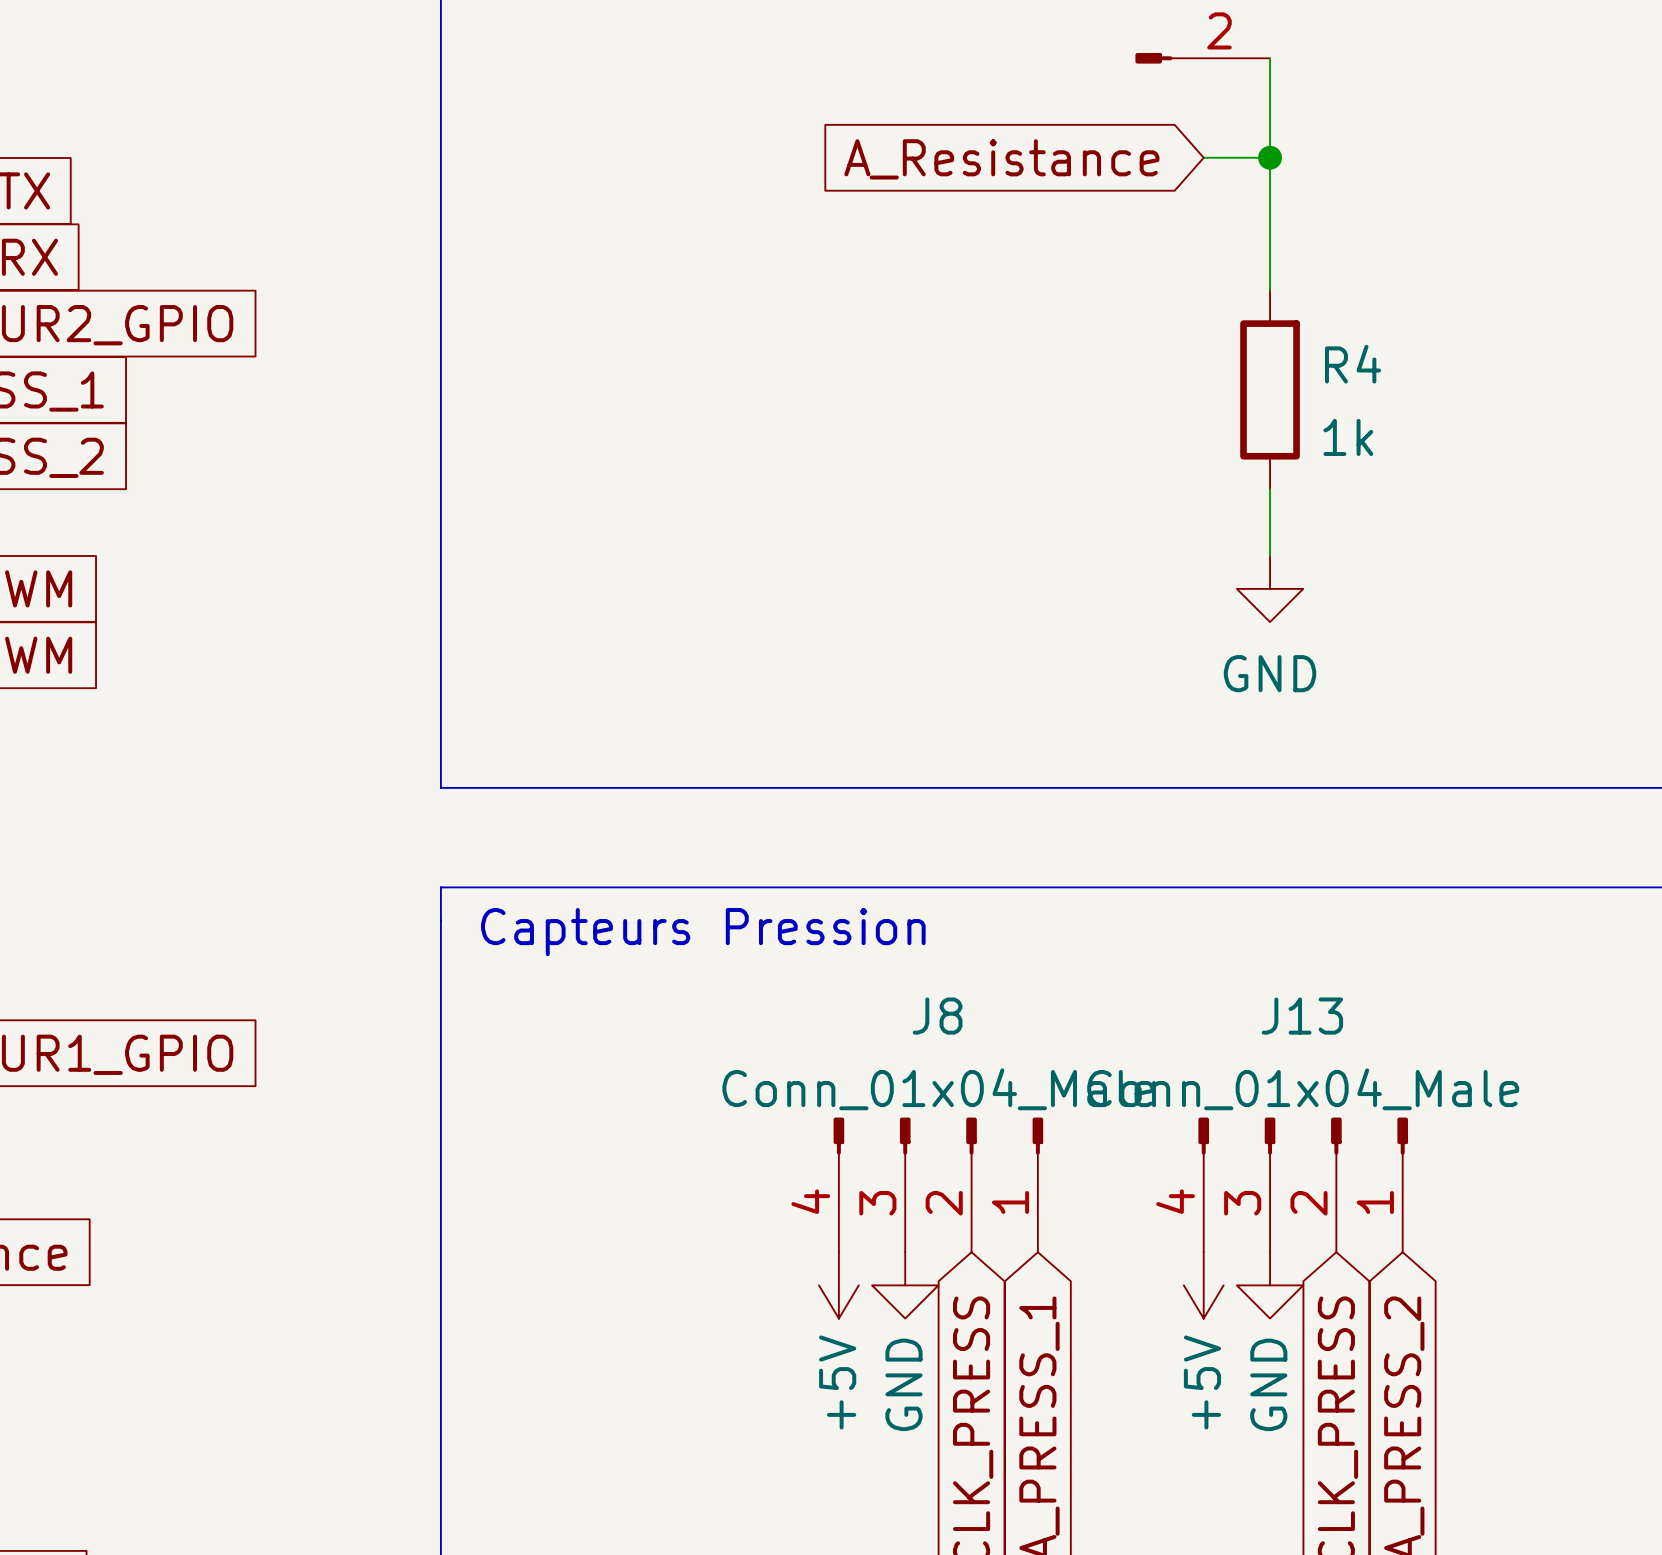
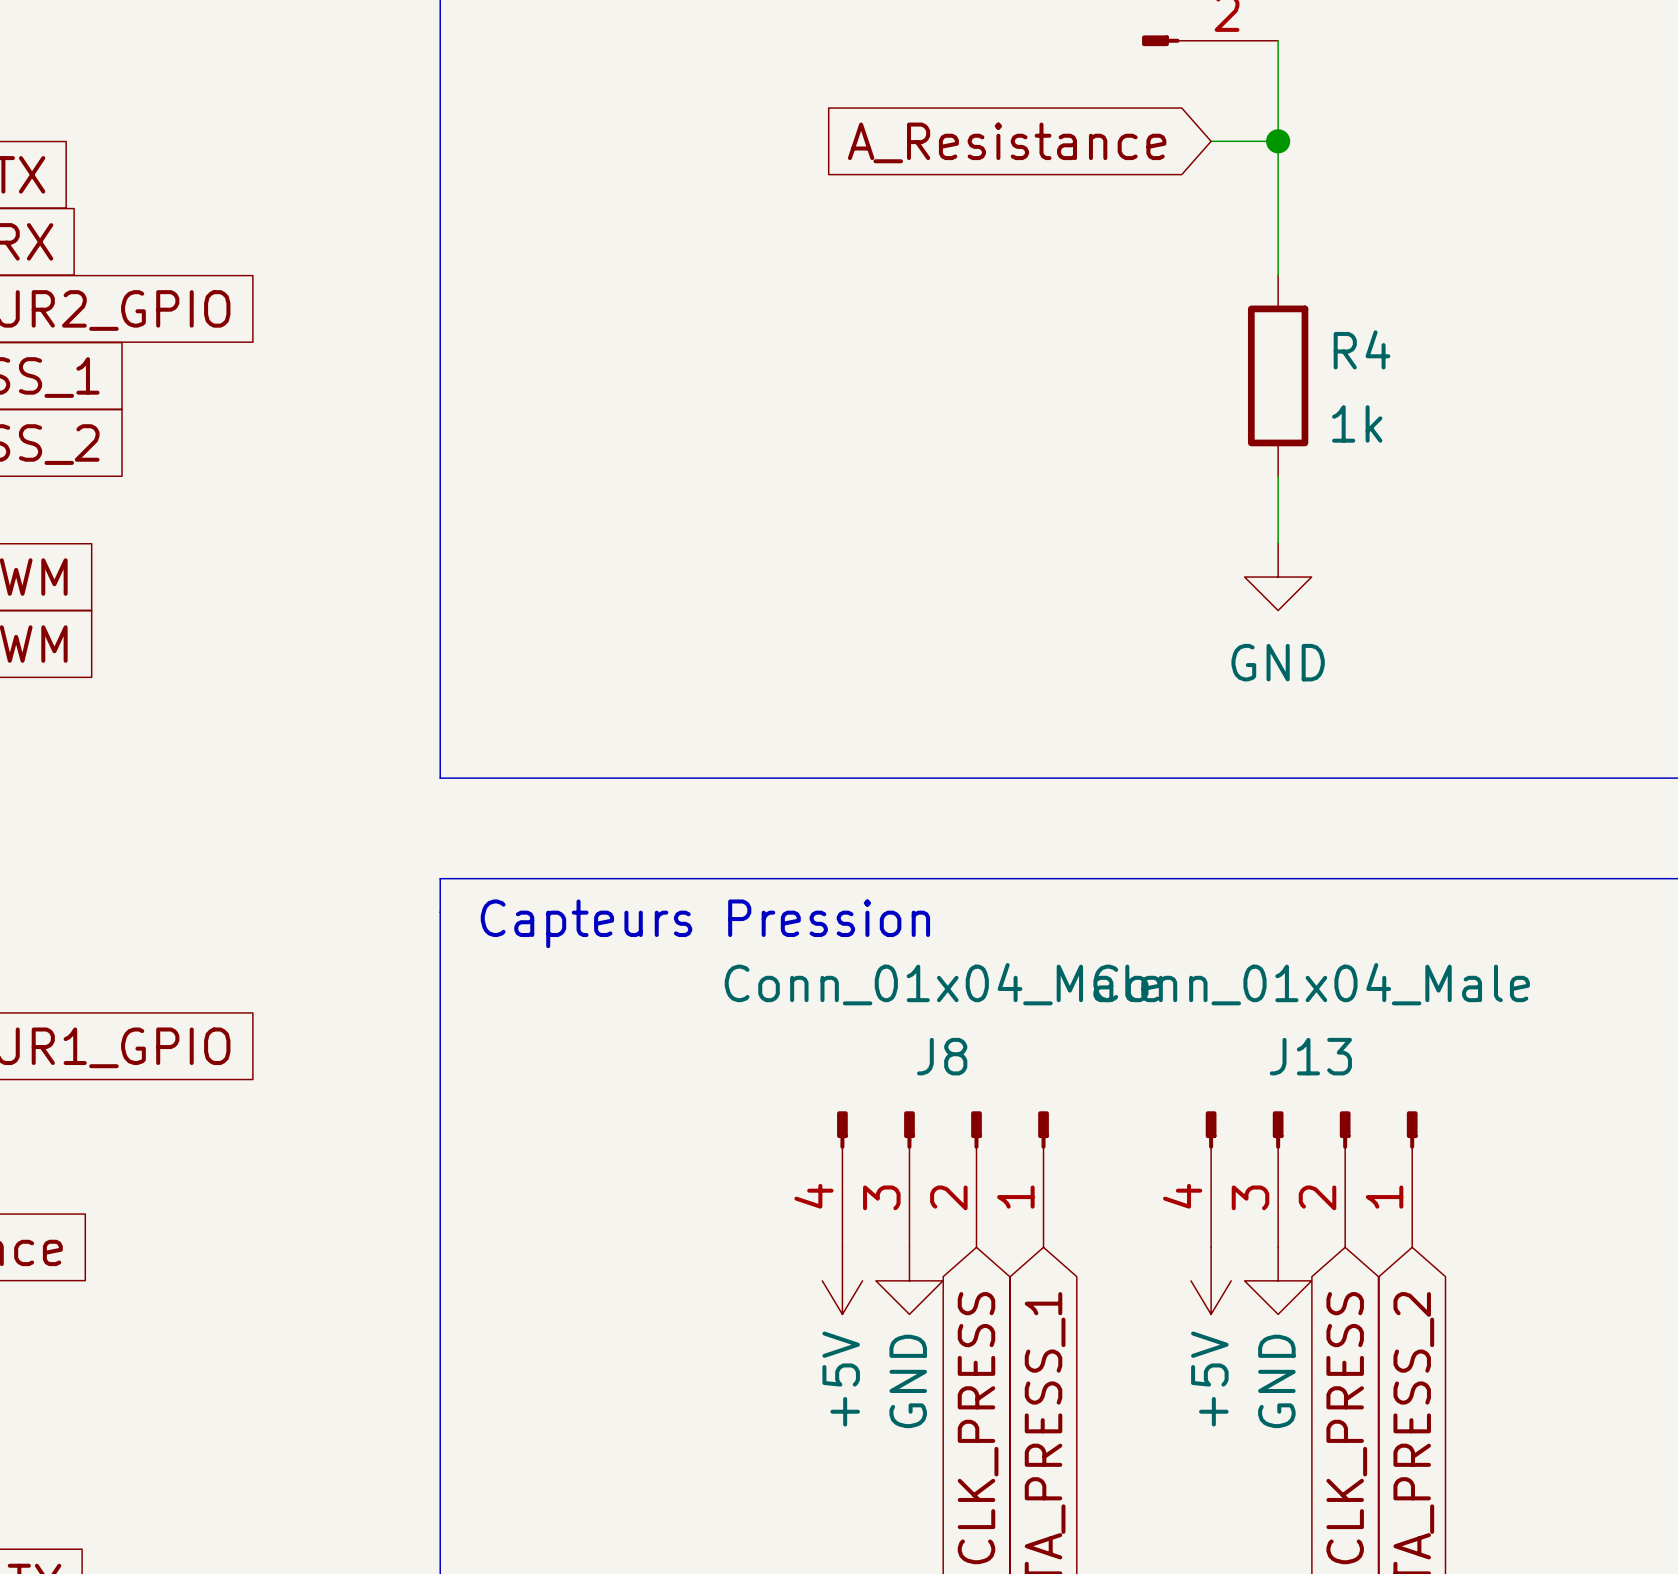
J8 name position: J8 (937, 1016) -> J8 (942, 1056)
J13 name position: J13 (1302, 1016) -> J13 (1310, 1056)
J8 value position: Conn_01x04_Male (938, 1089) -> Conn_01x04_Male (942, 984)
J13 value position: Conn_01x04_Male (1303, 1089) -> Conn_01x04_Male (1311, 984)

